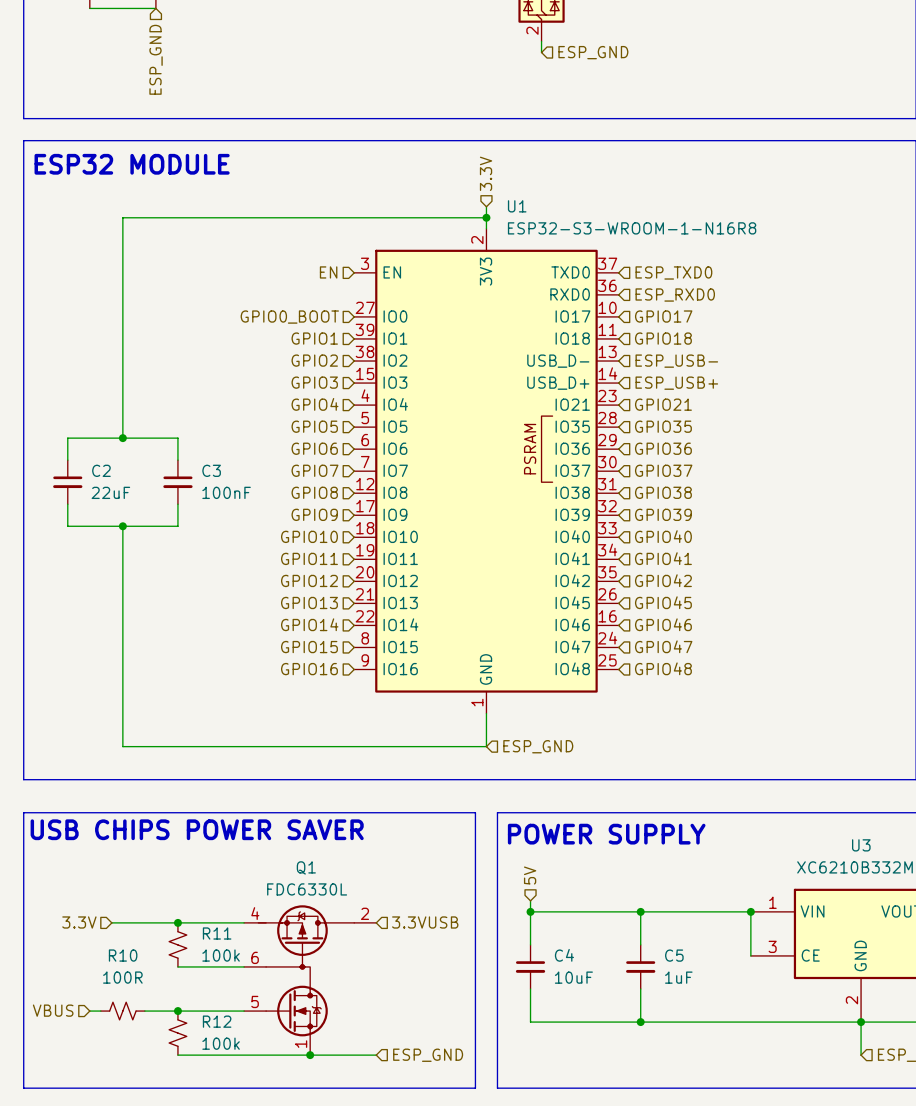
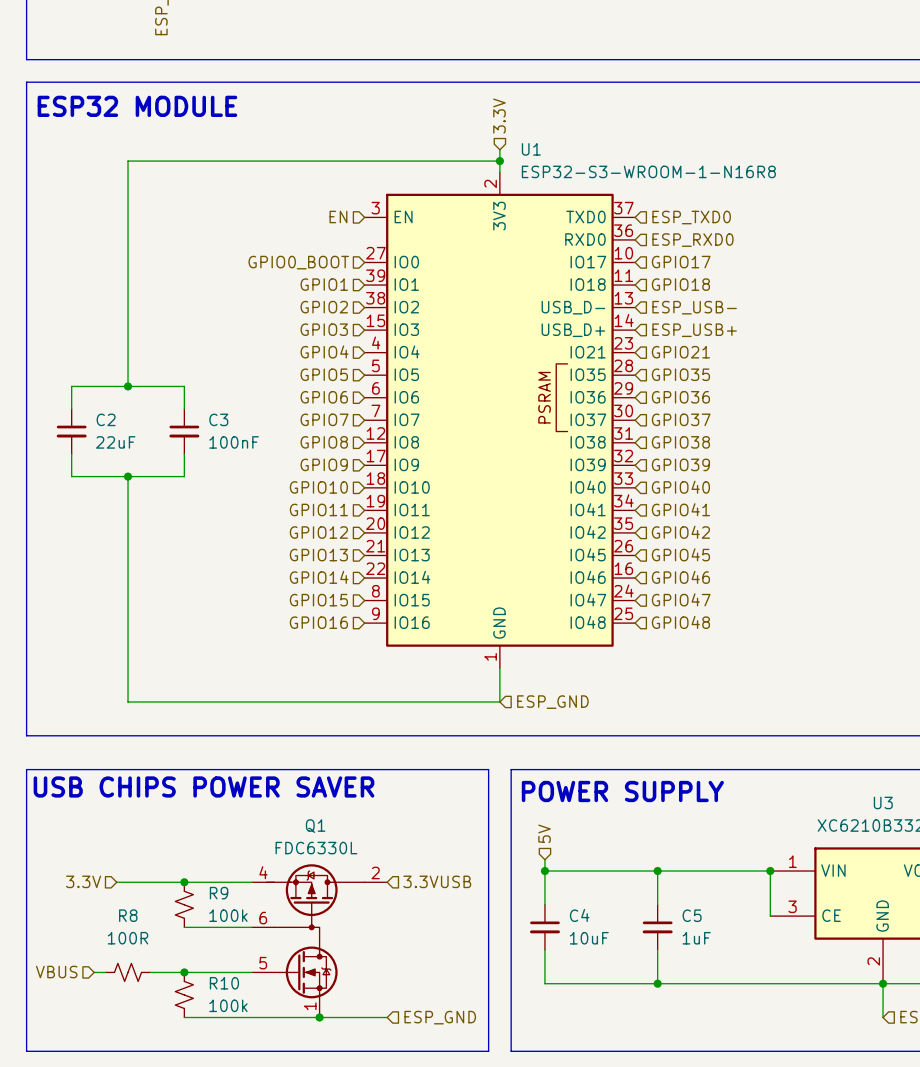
R11 name: R11 (217, 933) -> R9 (219, 893)
R10 name: R10 (123, 955) -> R8 (128, 915)
R12 name: R12 (217, 1021) -> R10 (224, 983)

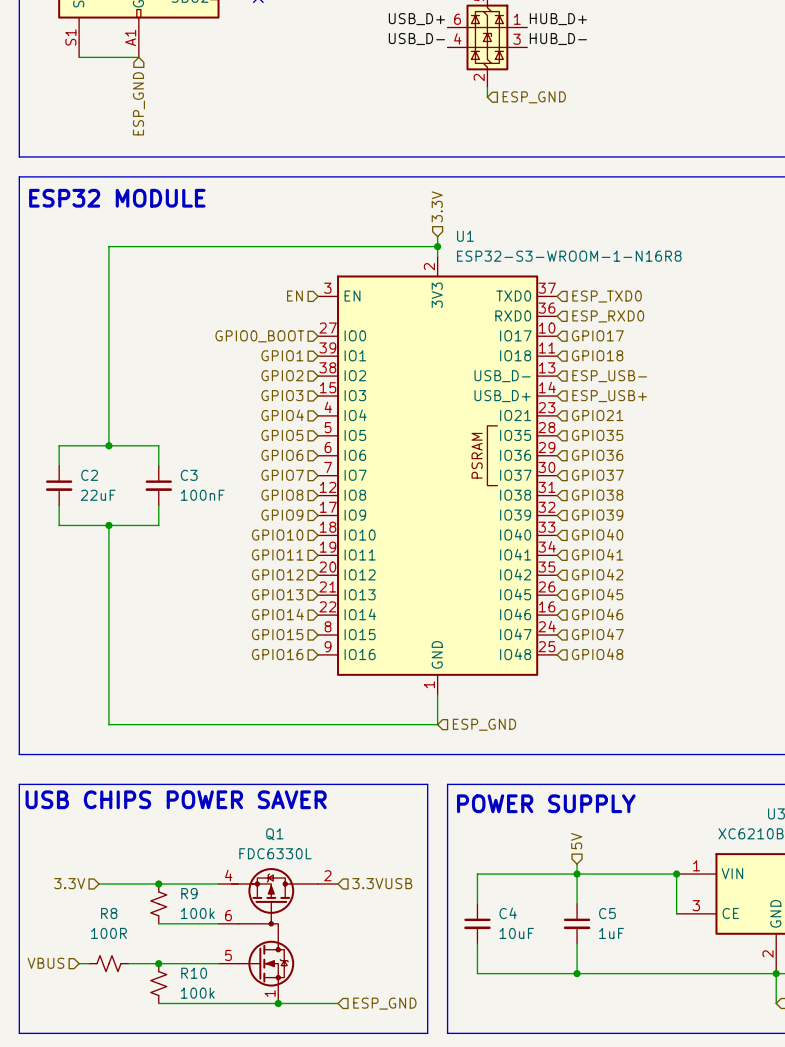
hierarchical label position: 5V (544, 833) -> 5V (576, 841)
wire: (544, 859) (544, 871) -> (577, 864) (577, 874)
junction: (544, 871) -> none

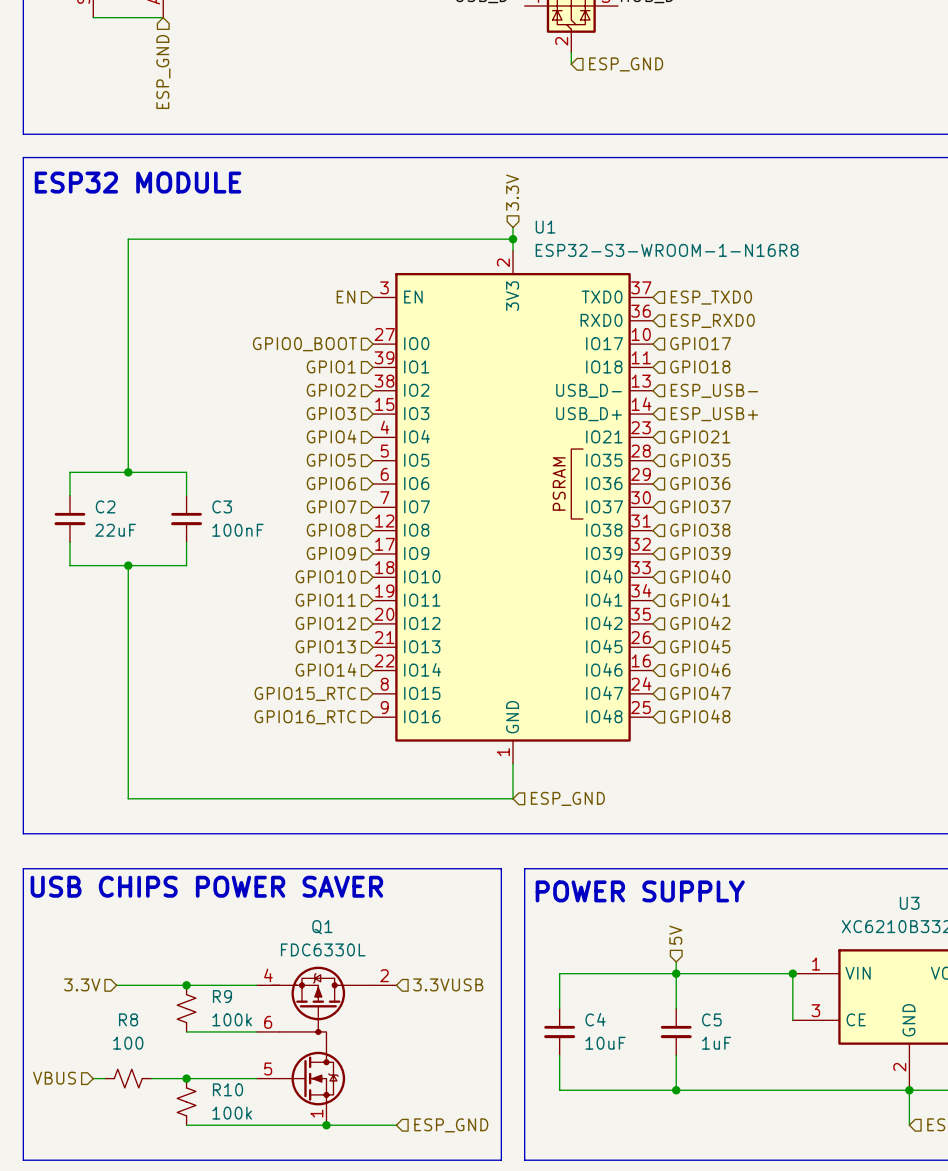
hierarchical label: GPIO15 (277, 634) -> GPIO15_RTC (305, 693)
hierarchical label: GPIO16 (277, 654) -> GPIO16_RTC (305, 717)
R8 value: 100R (108, 933) -> 100 (128, 1043)

